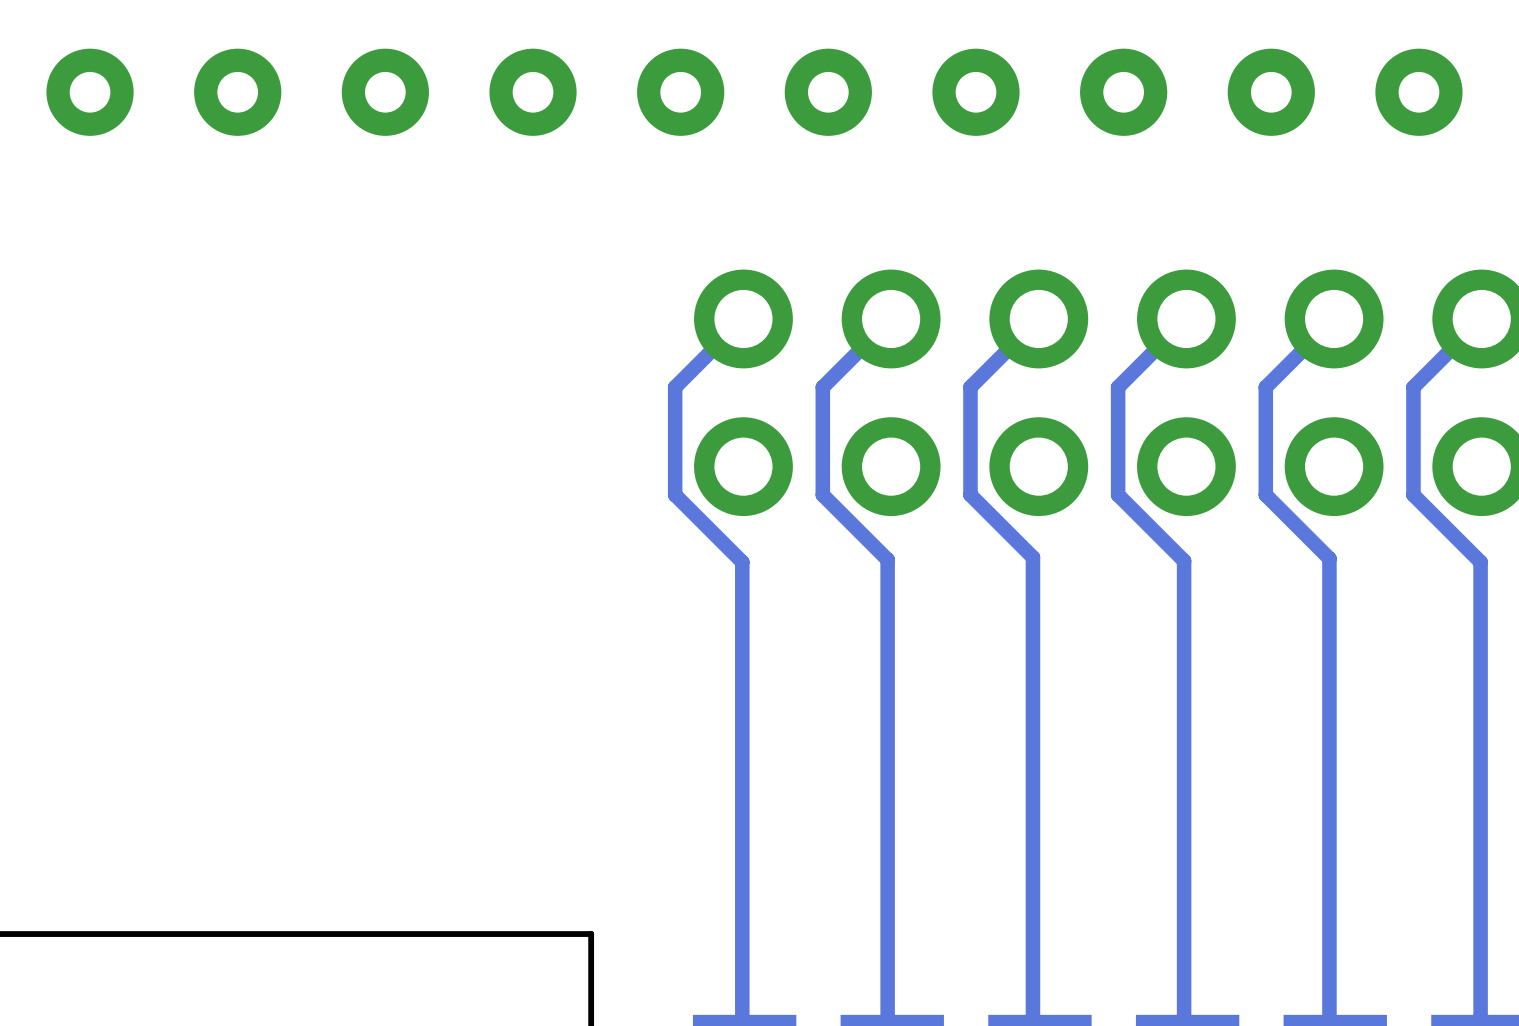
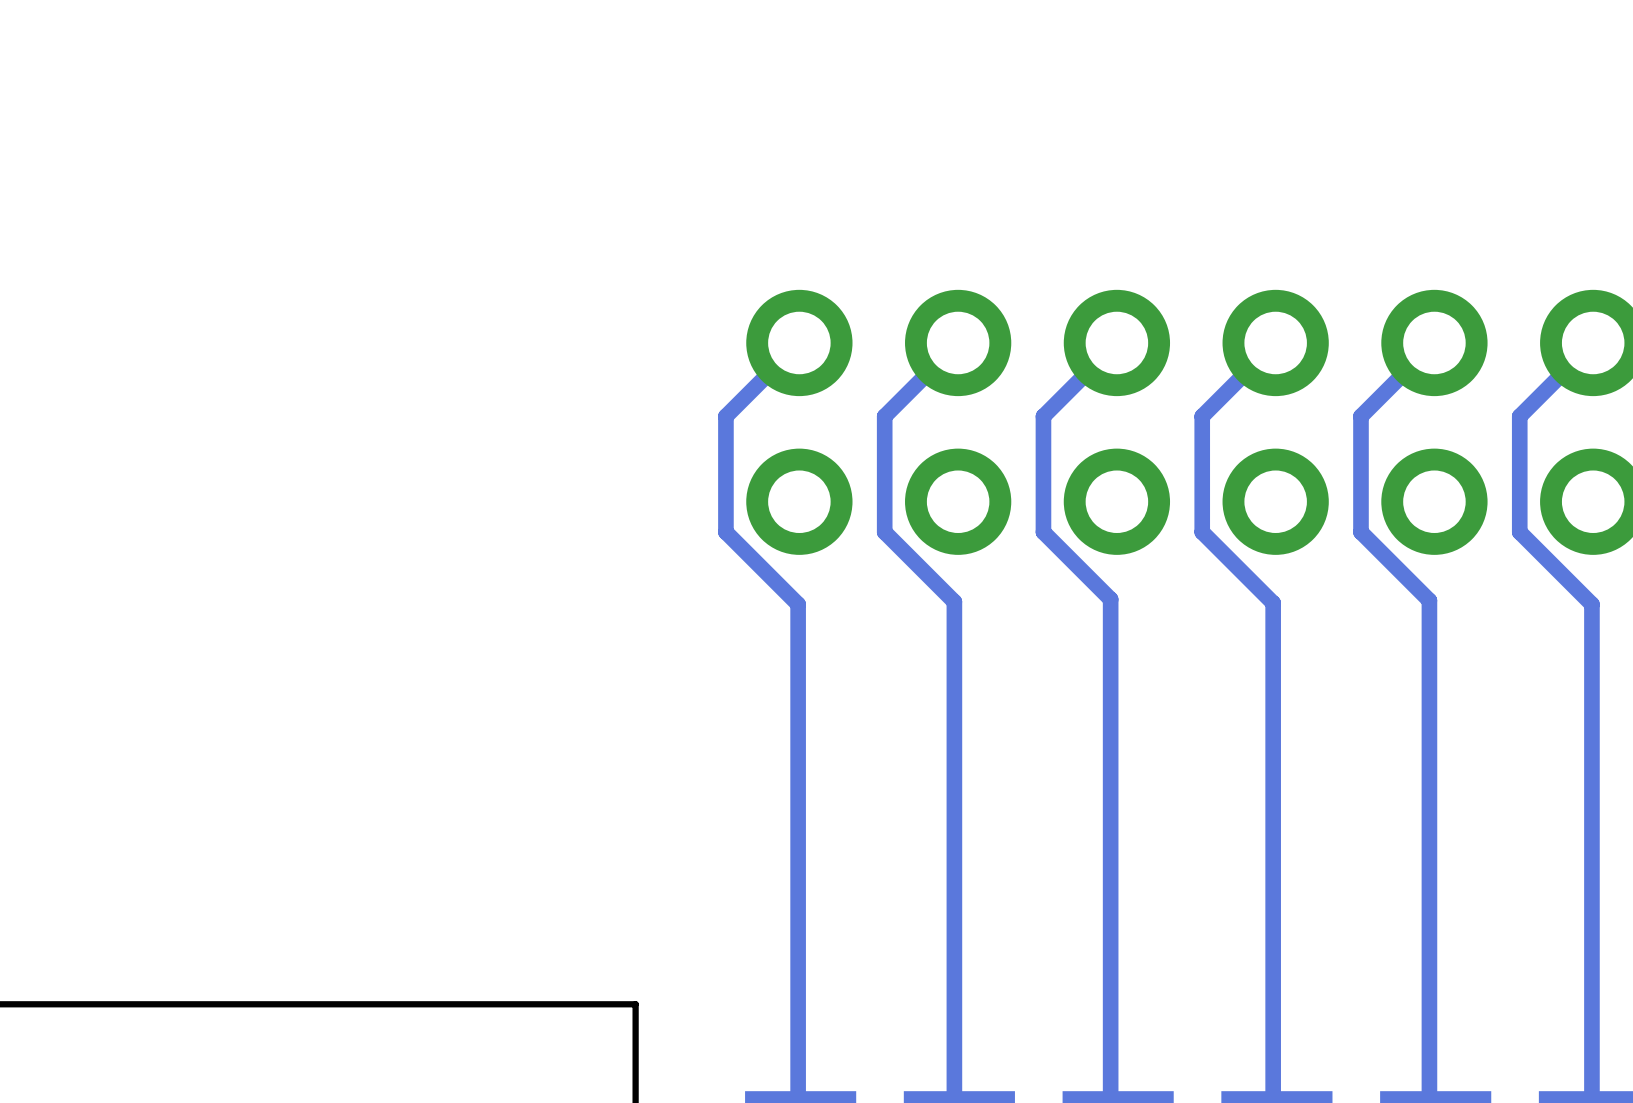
part: (90, 92) -> none
part: (237, 92) -> none
part: (385, 92) -> none
part: (533, 92) -> none
part: (680, 92) -> none
part: (828, 92) -> none
part: (975, 92) -> none
part: (1123, 92) -> none
part: (1271, 92) -> none
part: (1418, 92) -> none

